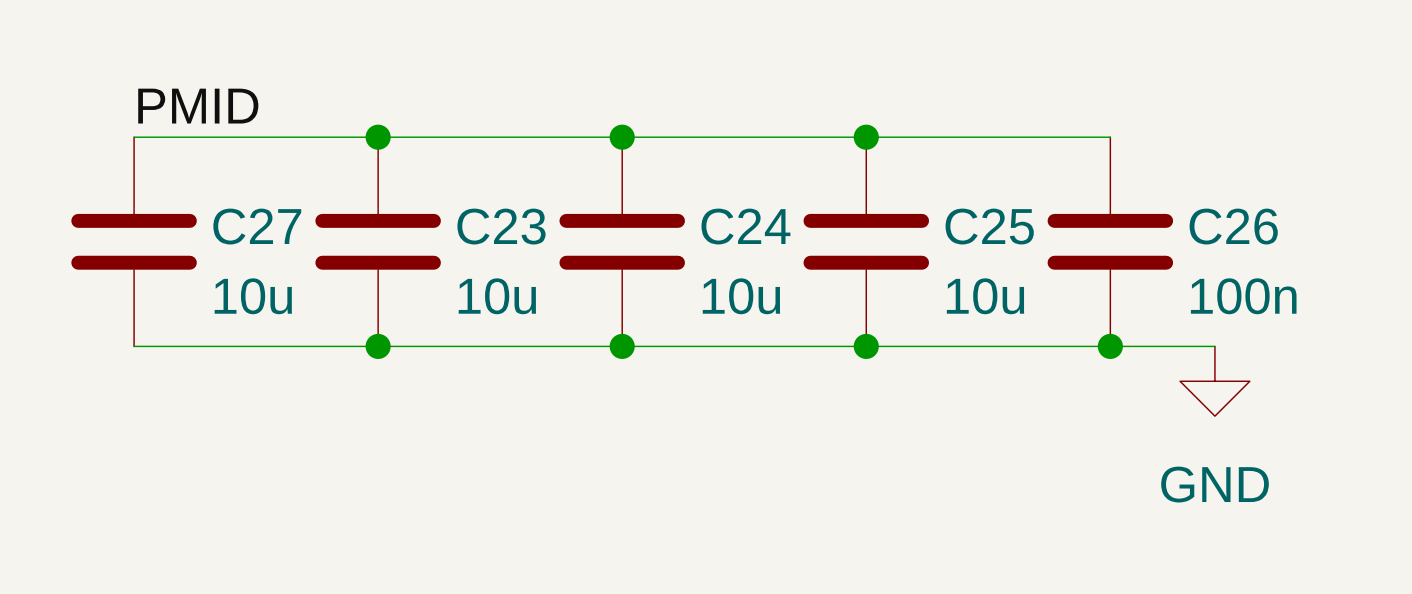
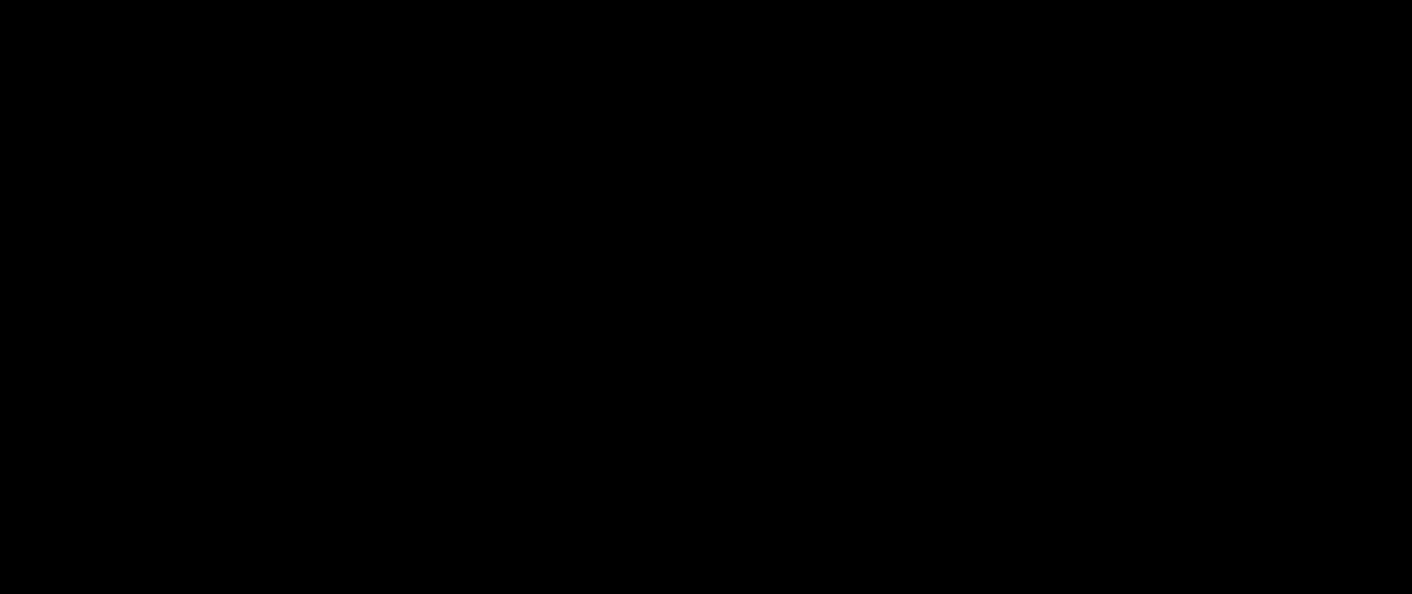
label: PMID (198, 106) -> none
wire: (134, 137) (1110, 137) -> none
junction: (378, 137) -> none
junction: (622, 137) -> none
junction: (866, 137) -> none
C27: 10u (134, 241) -> none
C23: 10u (378, 241) -> none
C24: 10u (622, 241) -> none
C25: 10u (866, 241) -> none
C26: 100n (1110, 241) -> none
wire: (134, 346) (1214, 346) -> none
junction: (378, 346) -> none
junction: (622, 346) -> none
junction: (866, 346) -> none
junction: (1110, 346) -> none
power symbol: GND (1214, 381) -> none

